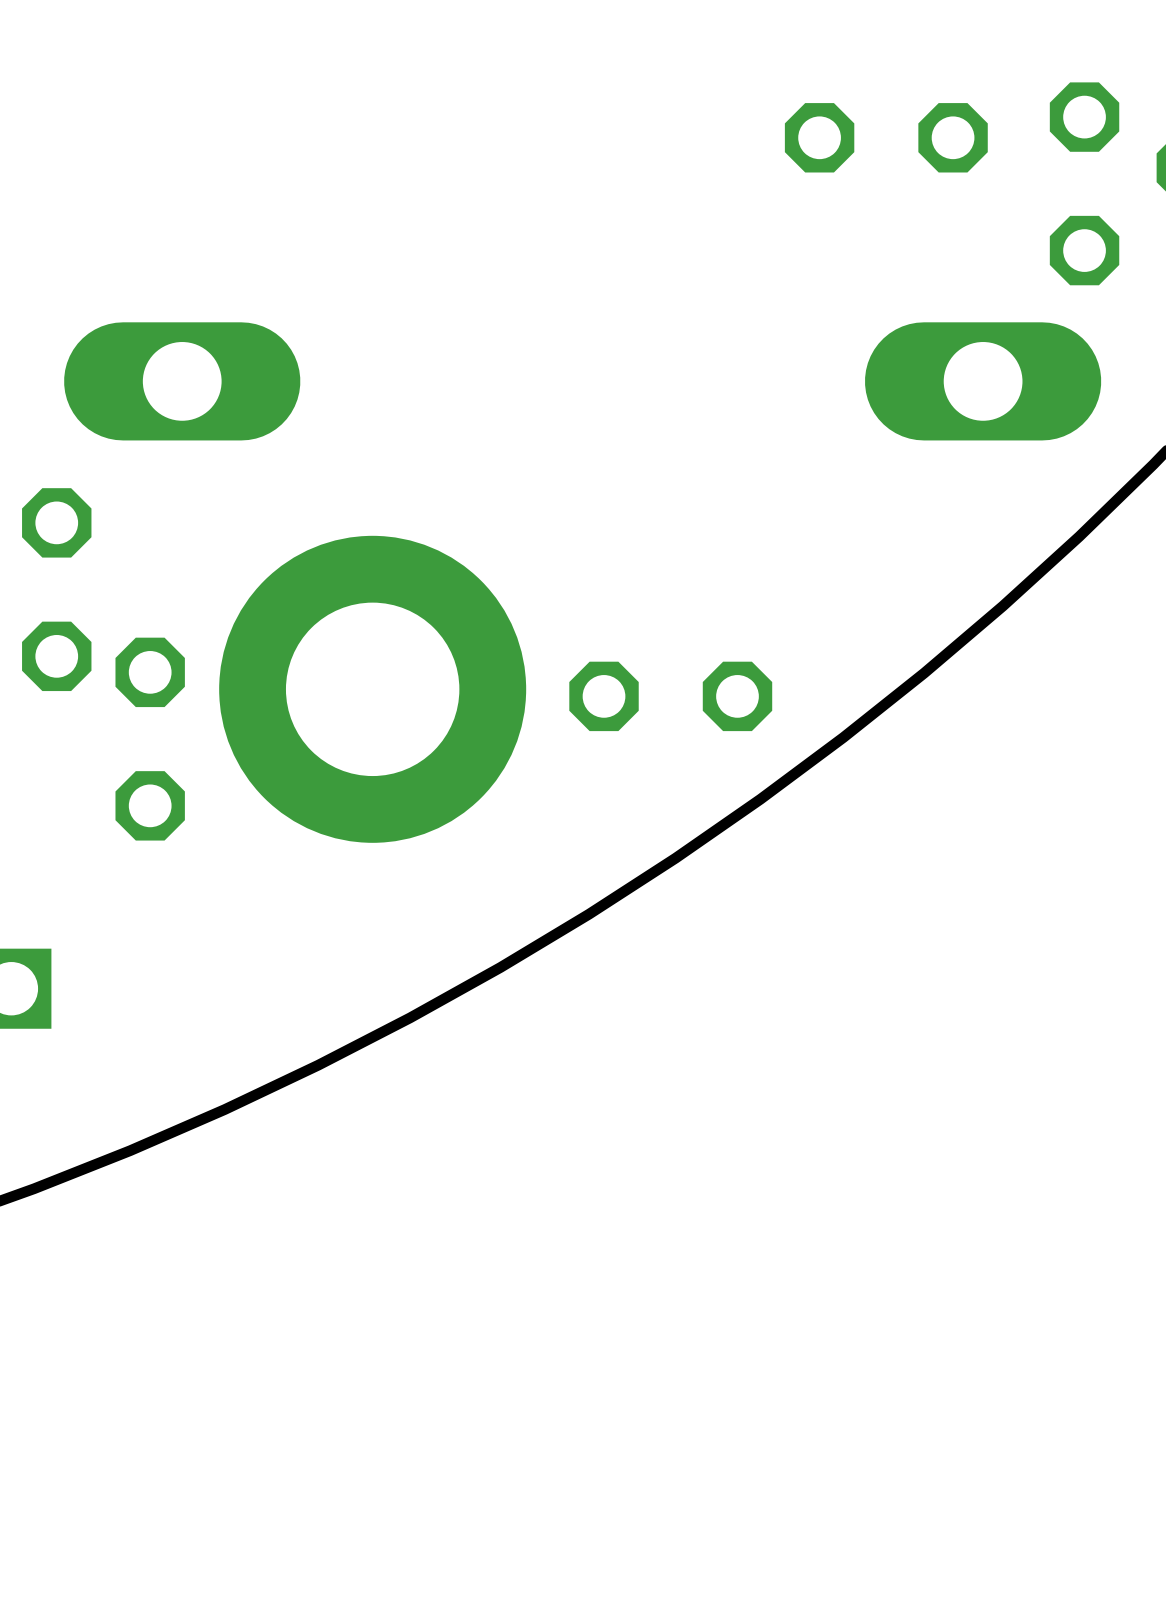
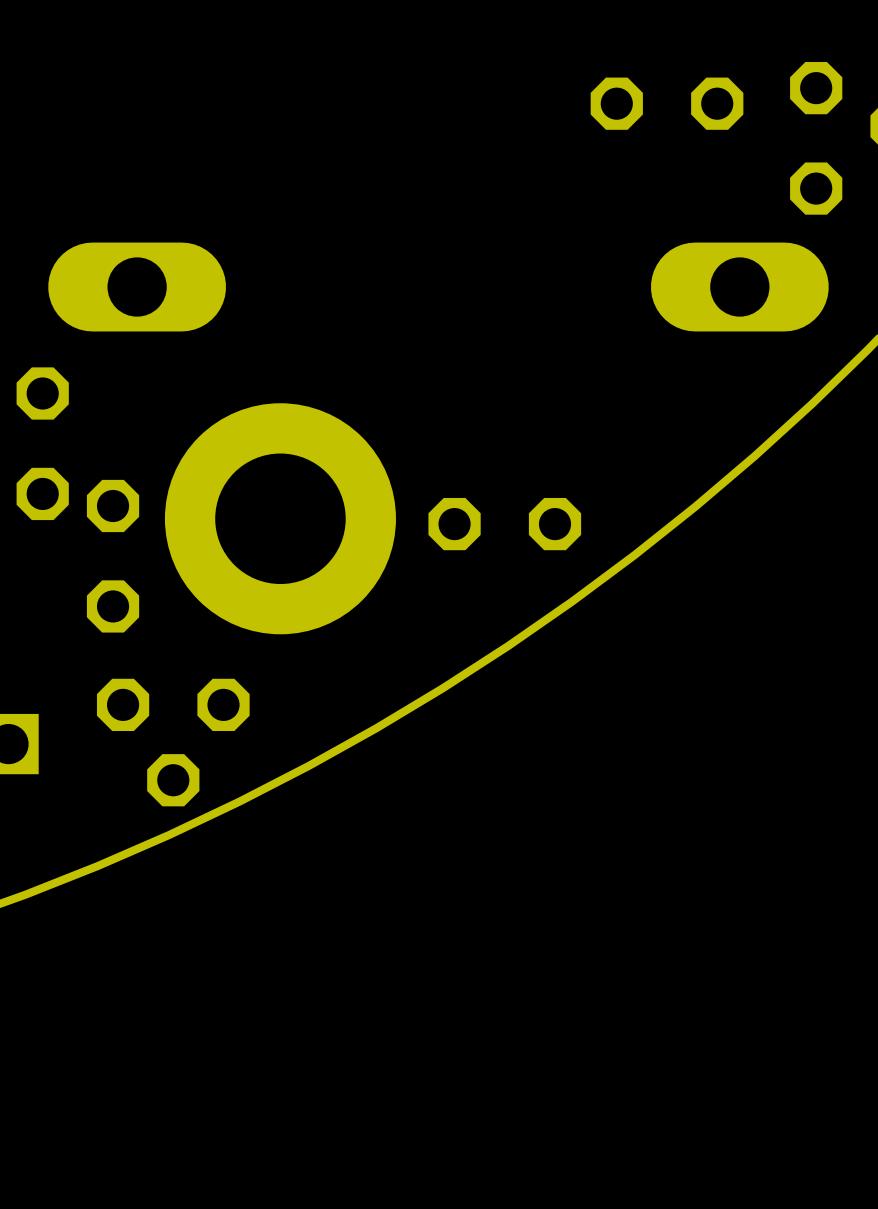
part: none -> (173, 742)

